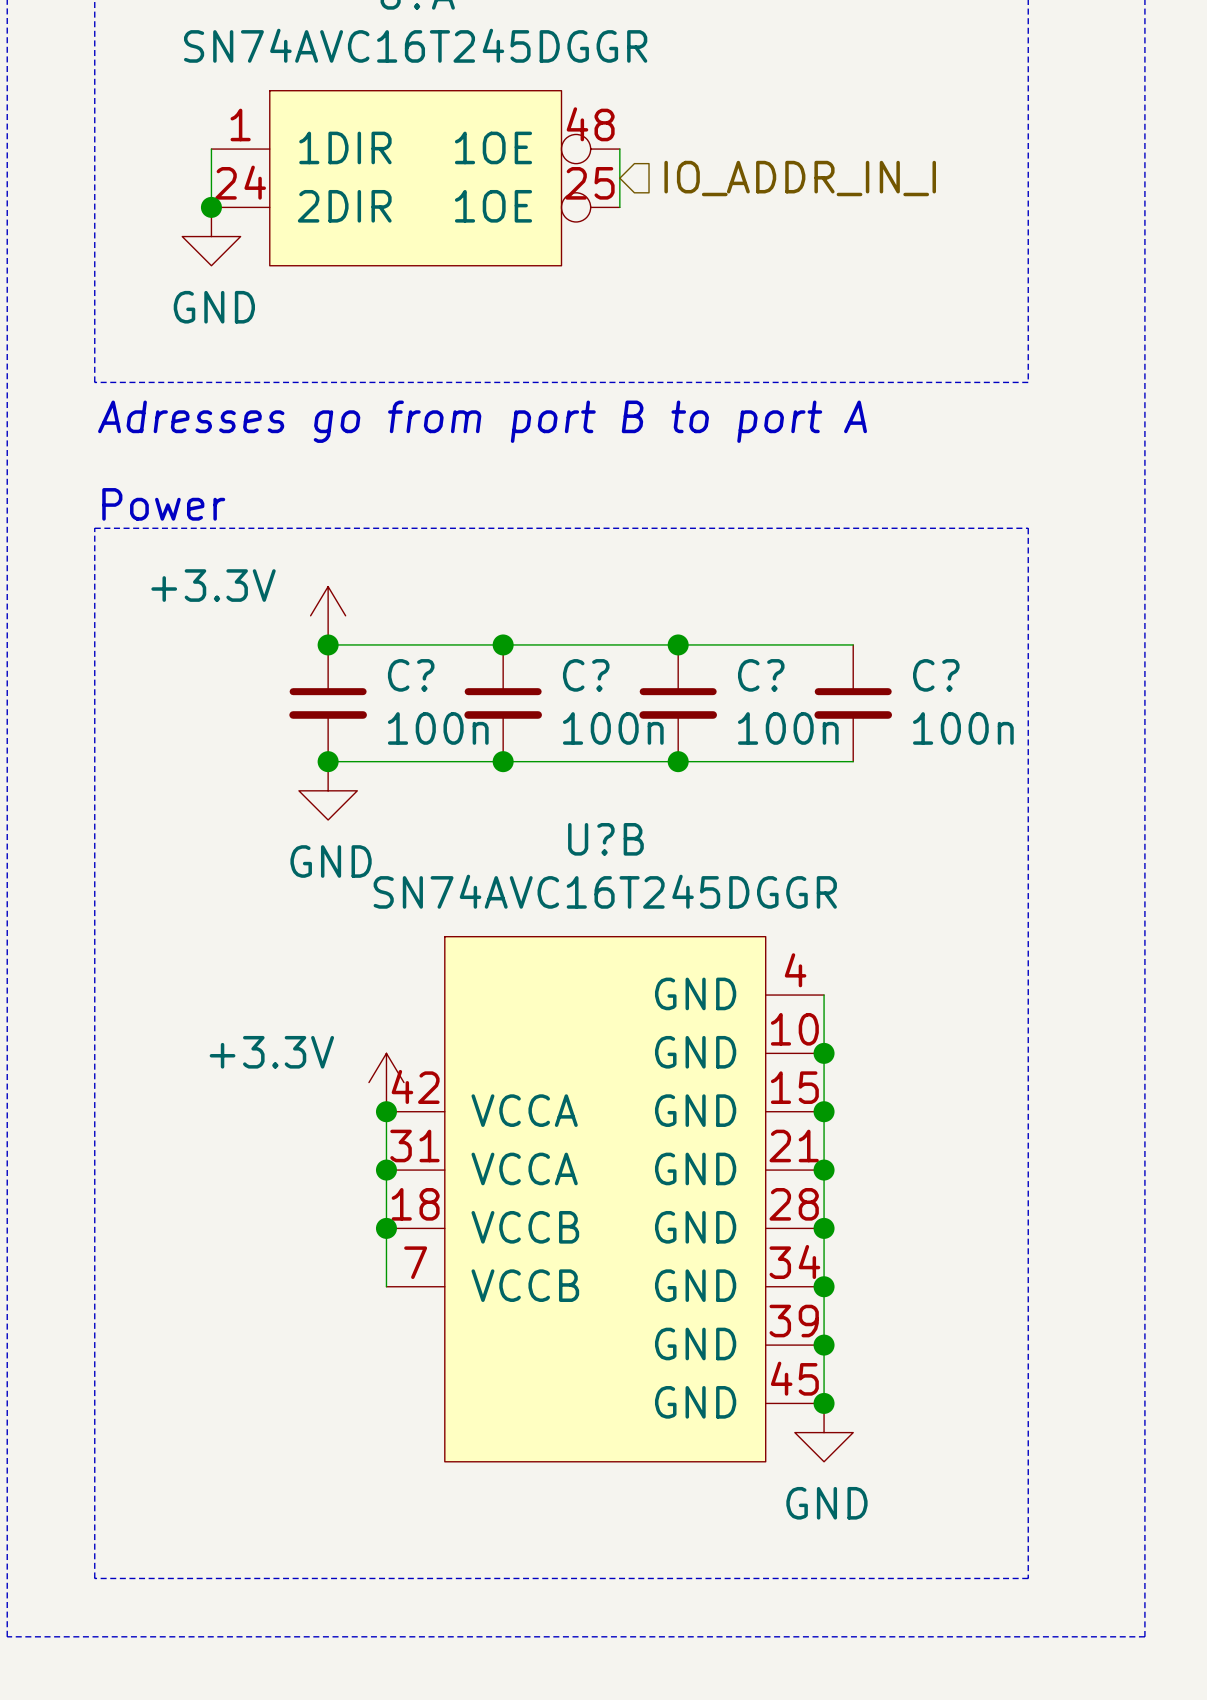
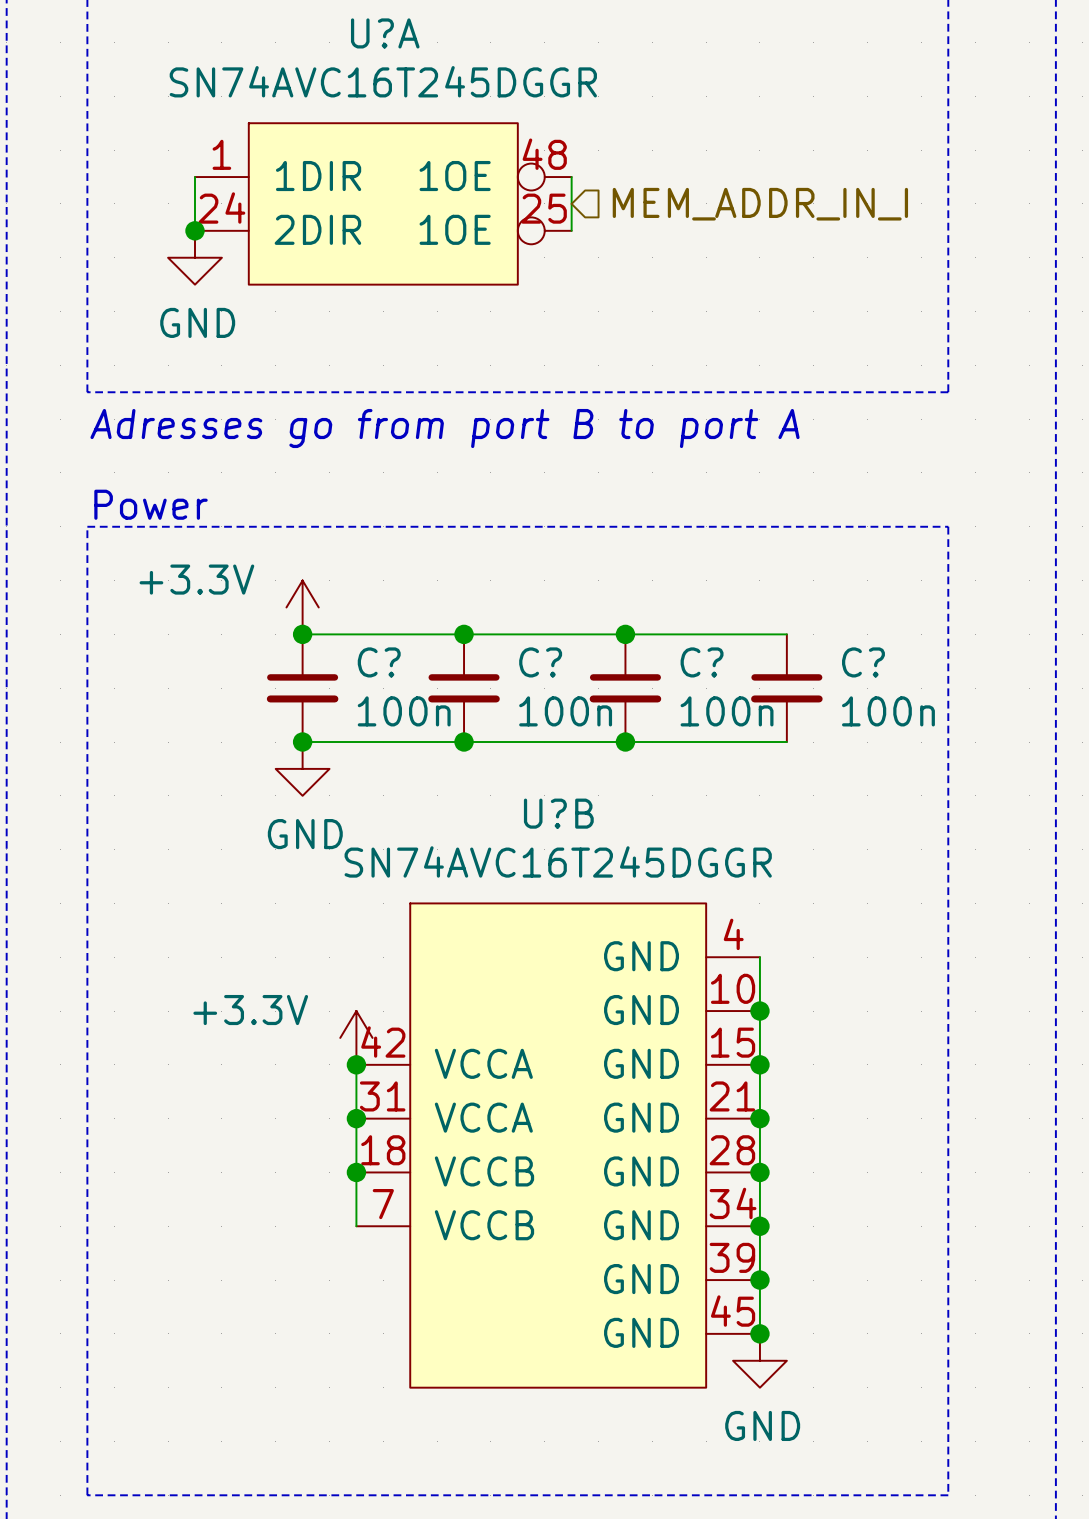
hierarchical label: IO_ADDR_IN_I (800, 178) -> MEM_ADDR_IN_I (760, 204)

